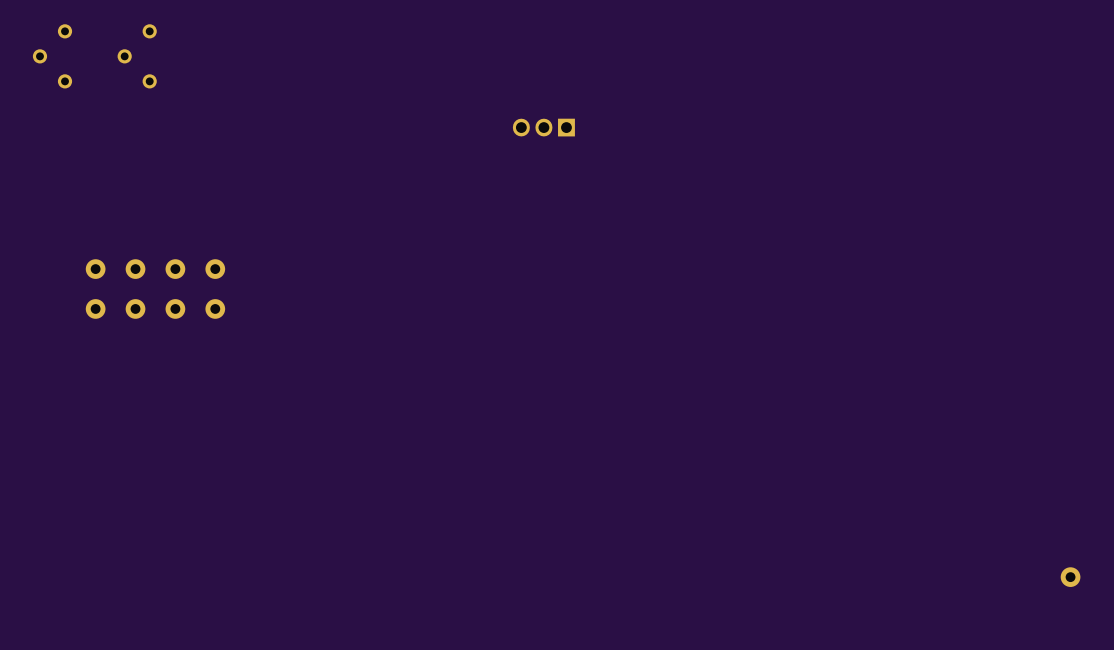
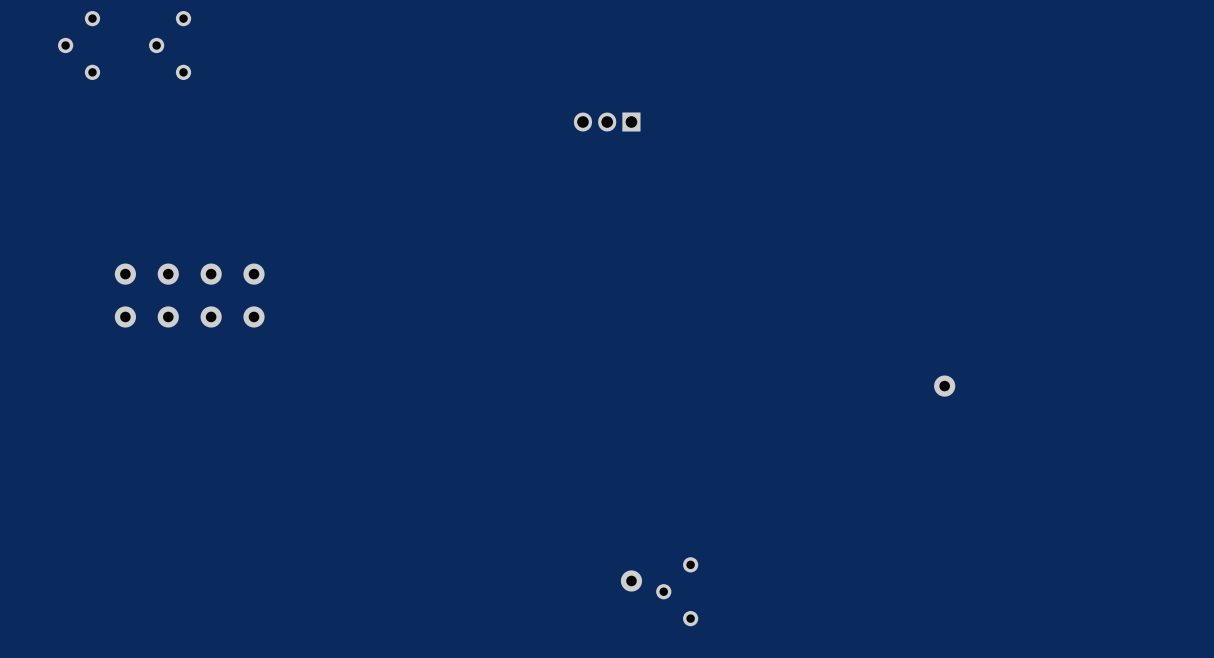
part: none -> (944, 386)
part: none -> (631, 580)
part: none -> (677, 591)
part: (1070, 577) -> none

